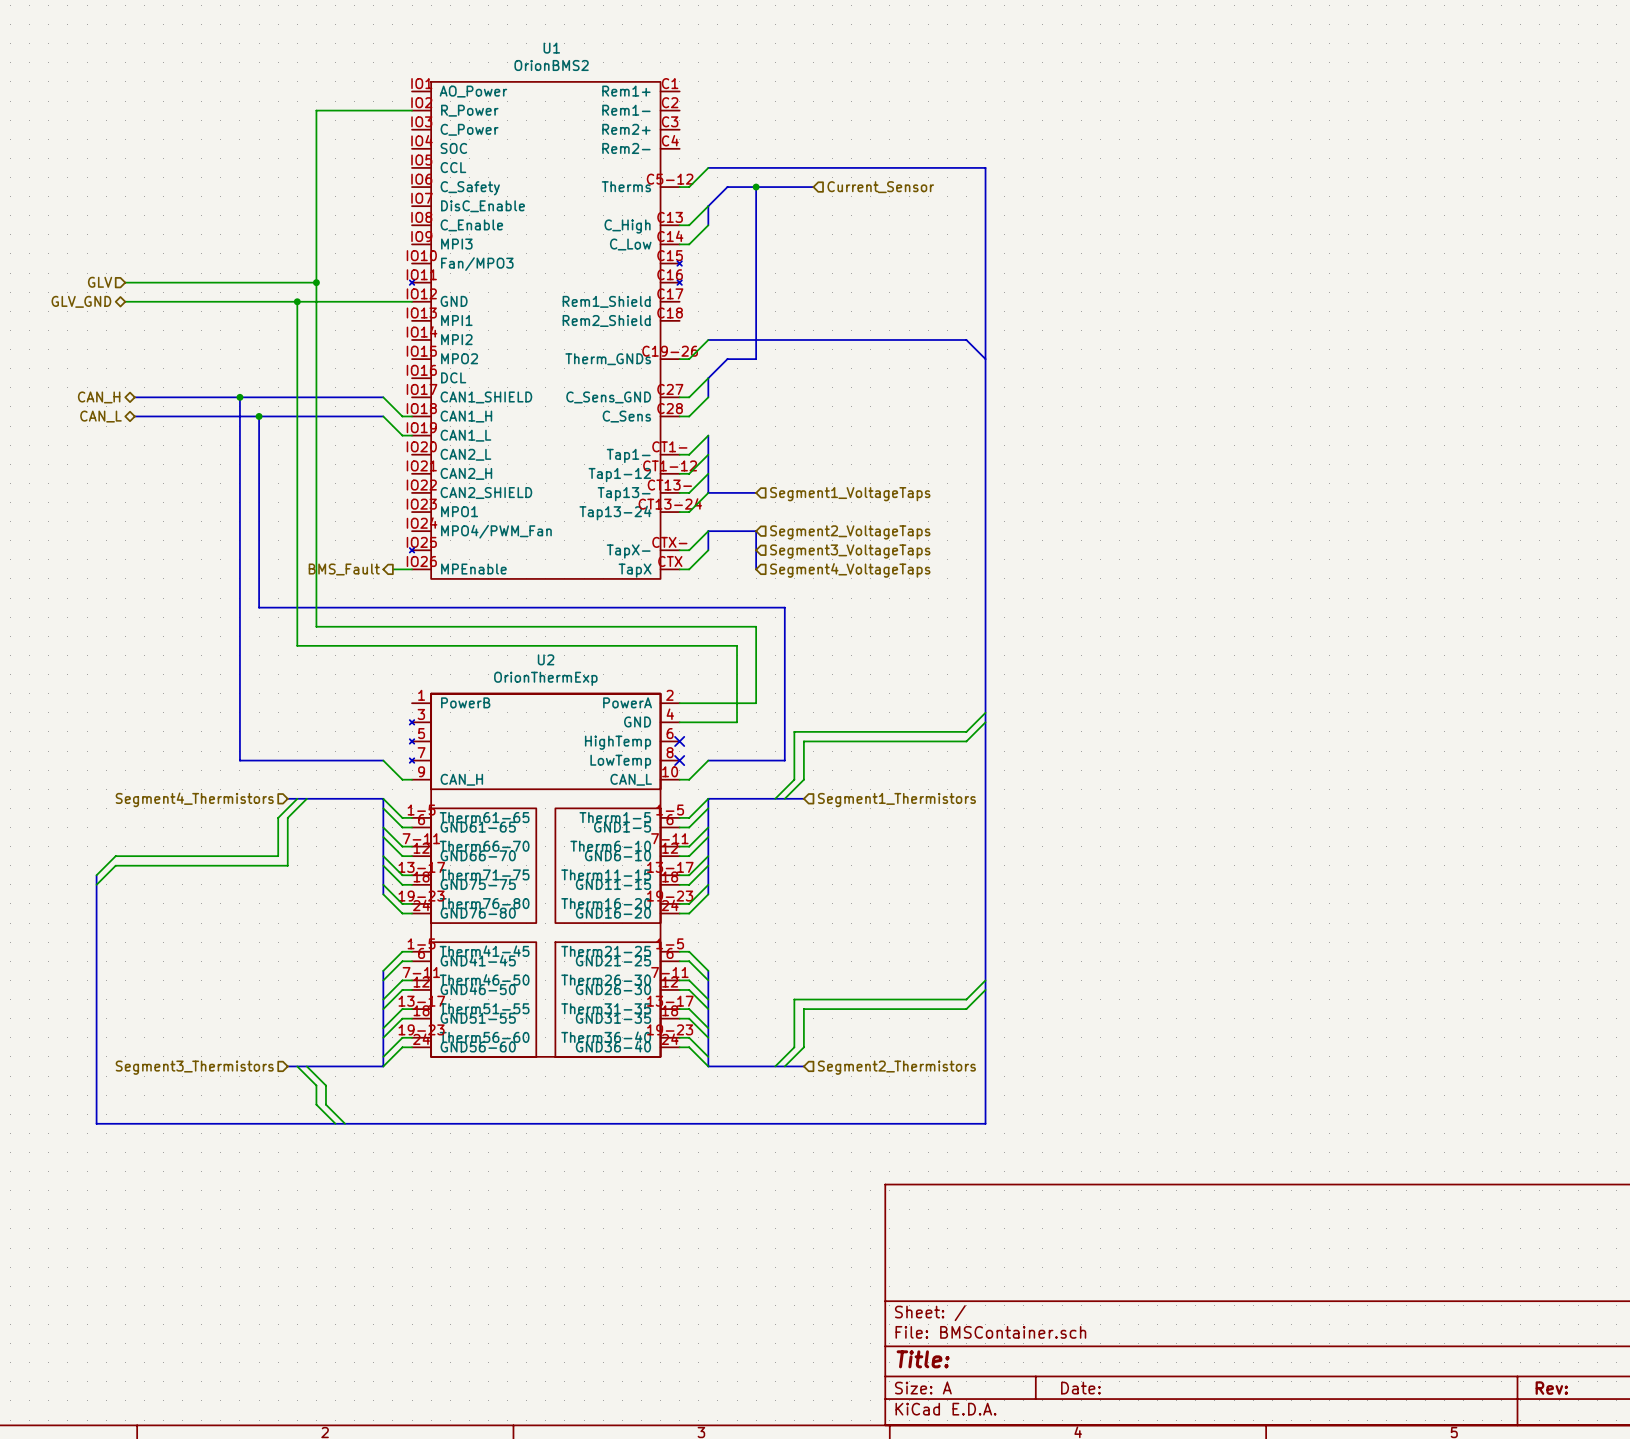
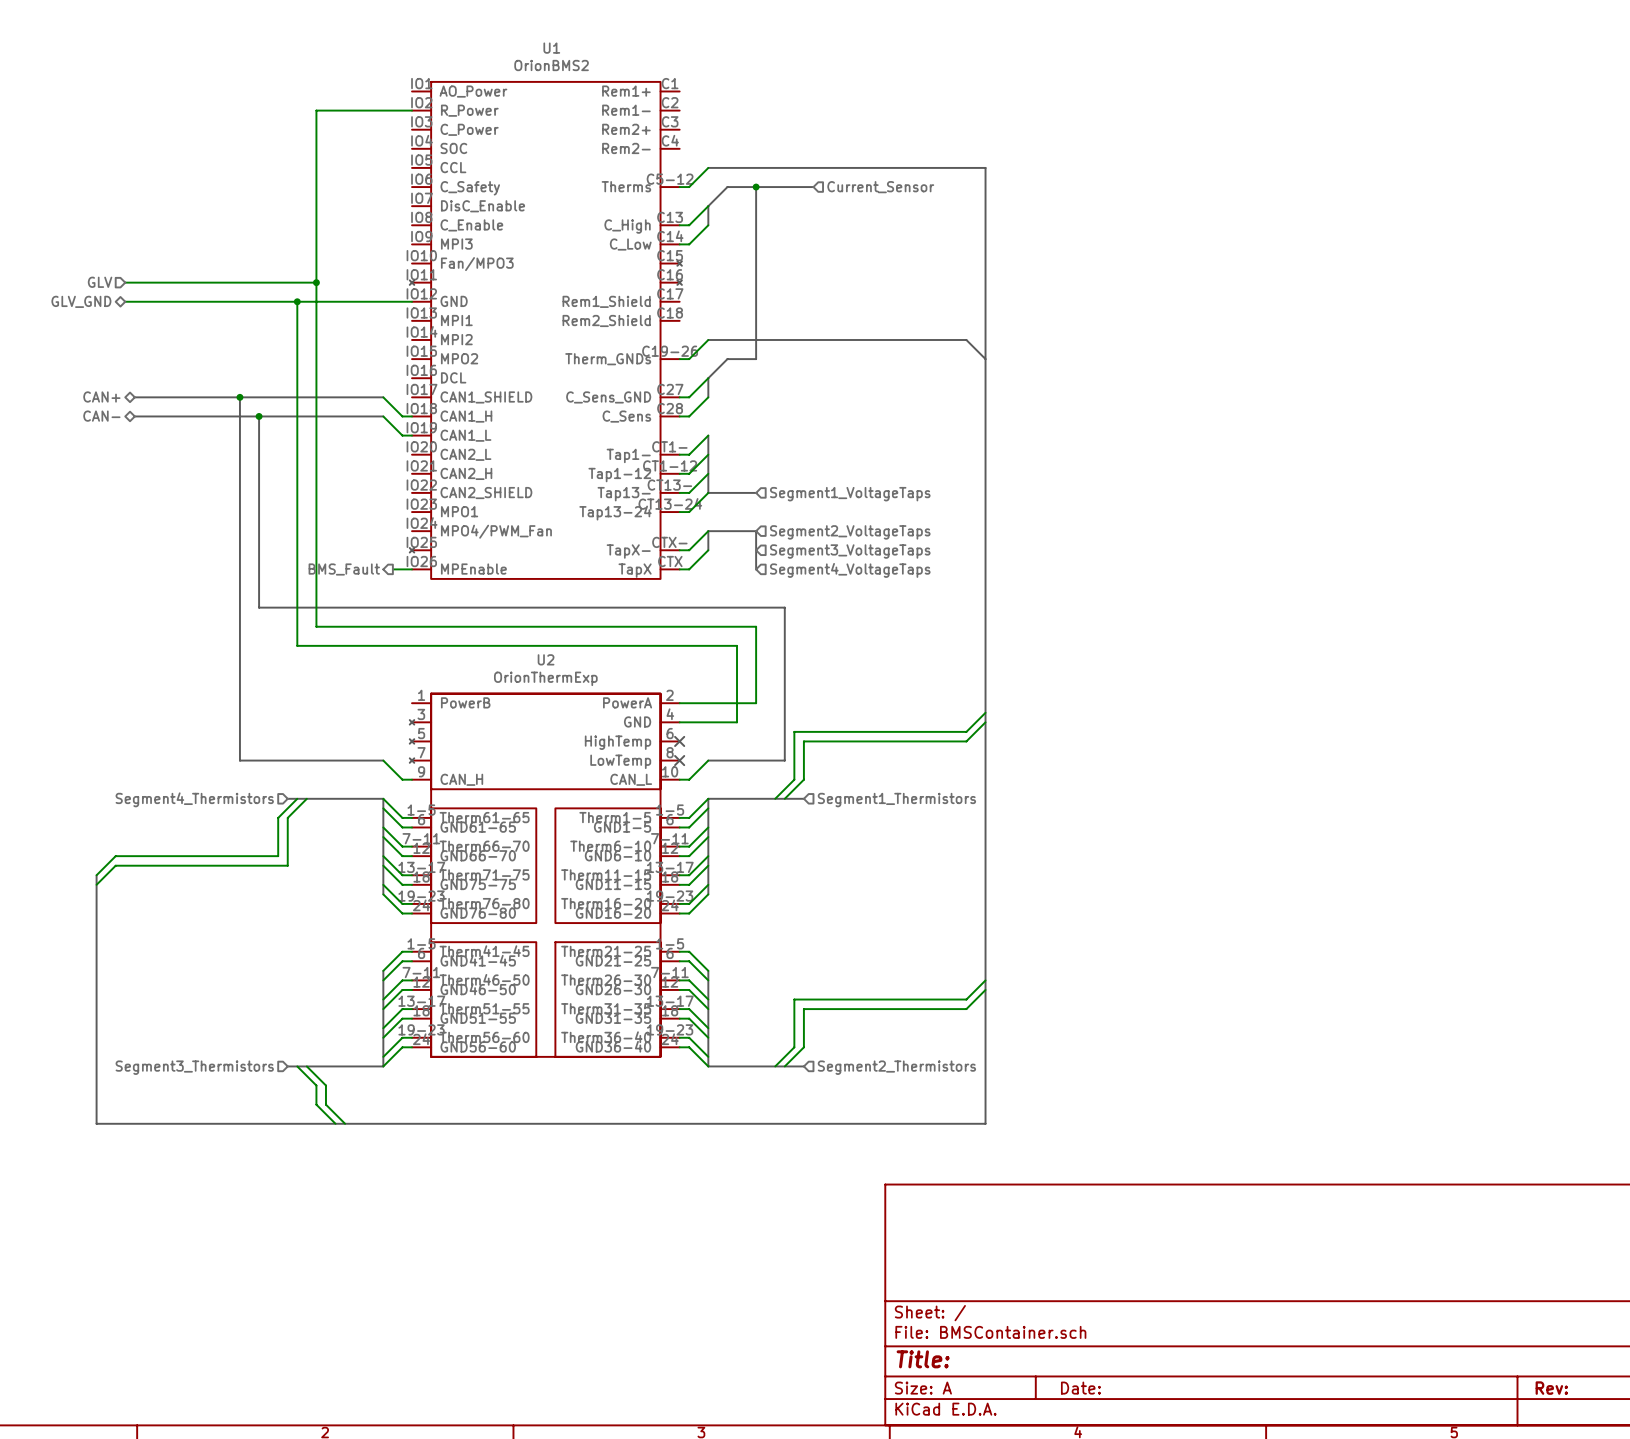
hierarchical label: CAN_H (99, 397) -> CAN+ (101, 396)
hierarchical label: CAN_L (100, 416) -> CAN- (101, 416)

